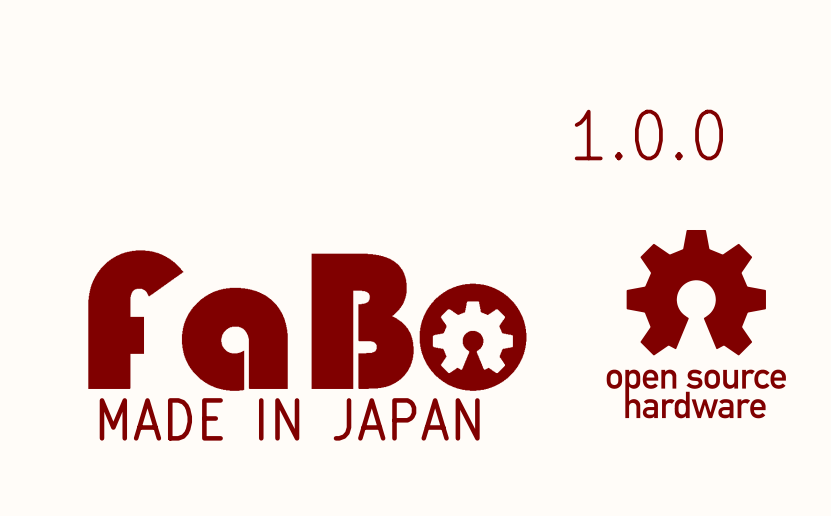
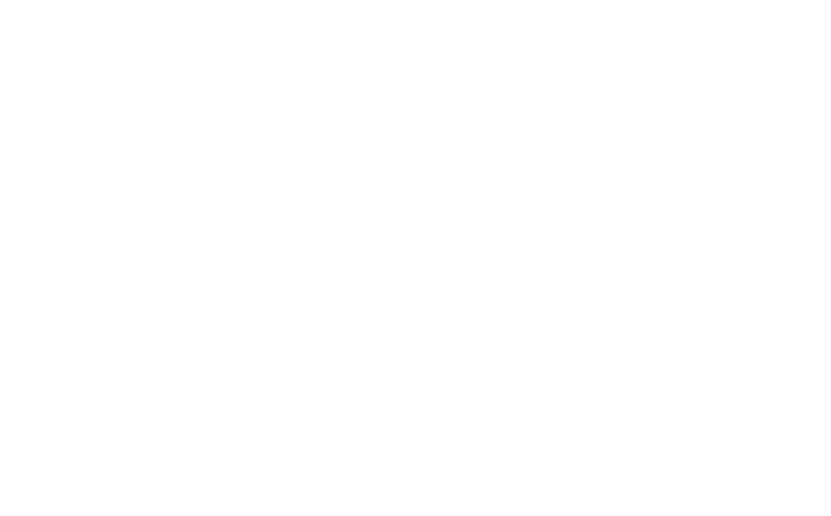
text: 1.0.0 (648, 135) -> none
part: (307, 320) -> none
part: (696, 324) -> none

